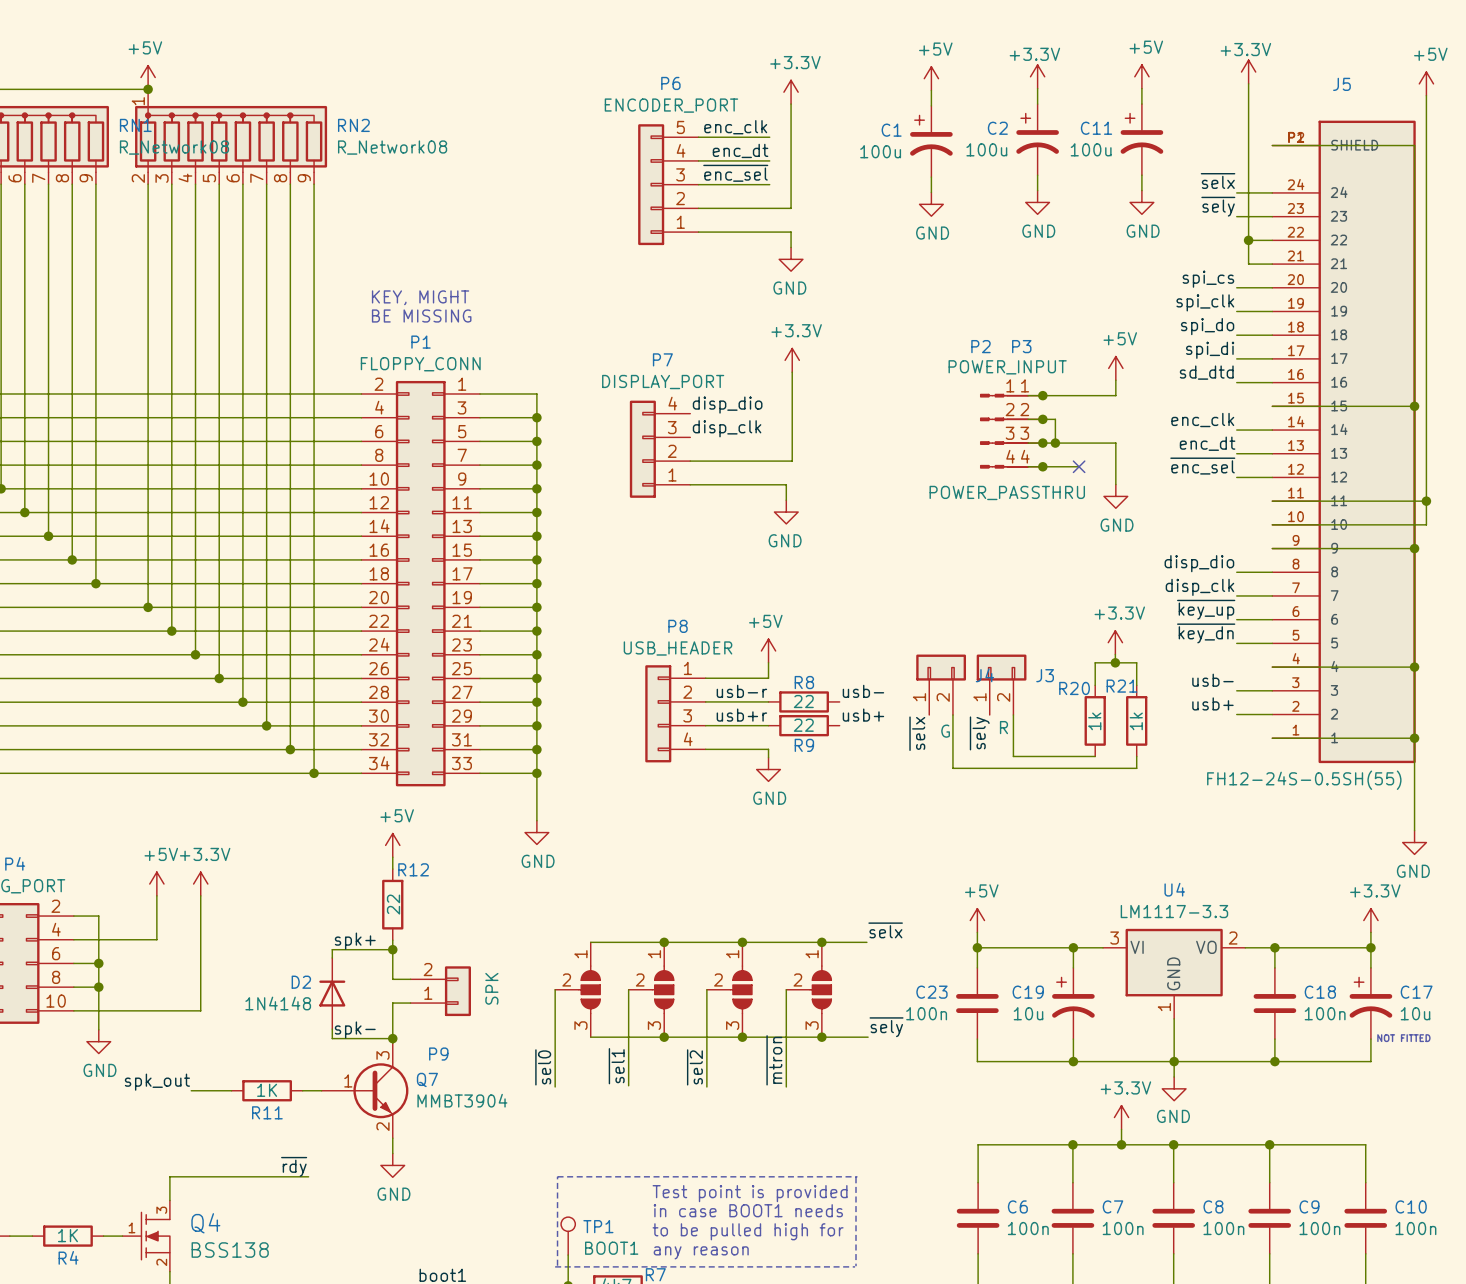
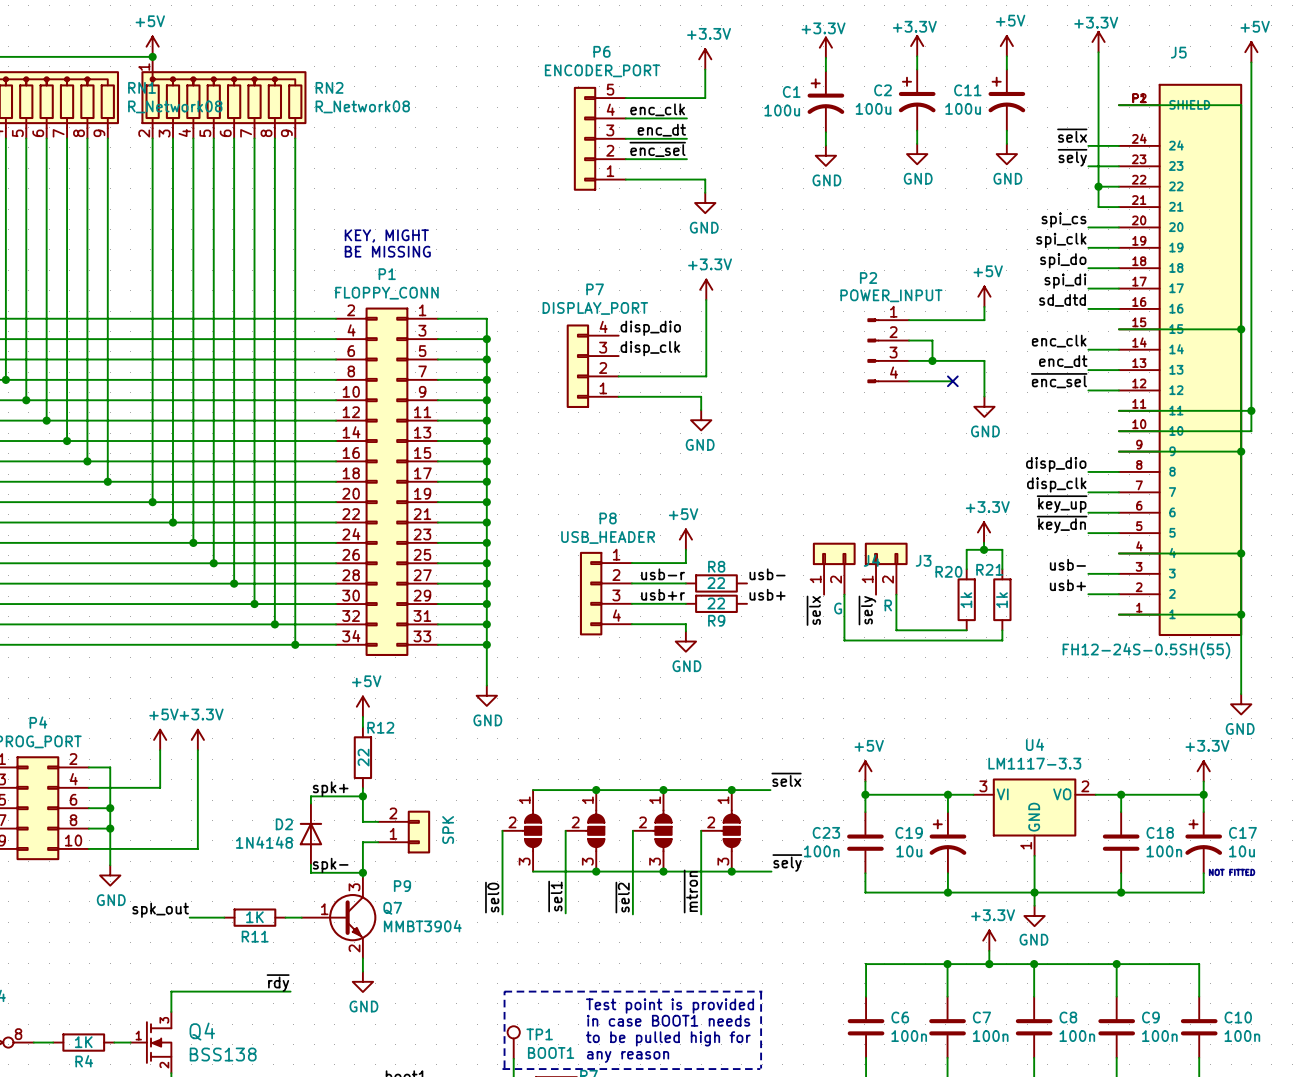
power symbol: +5V (931, 78) -> +3.3V (825, 47)
label: enc_clk (735, 127) -> none
wire: (791, 137) (791, 208) (769, 208) -> (705, 98) (686, 98)
label: enc_dt (740, 150) -> enc_clk (657, 109)
label: ~{enc_sel} (735, 173) -> enc_dt (661, 130)
label: none -> ~{enc_sel} (657, 149)
junction: (1042, 395) -> none
junction: (1042, 419) -> none
P3: POWER_PASSTHRU (1018, 431) -> none
junction: (1042, 443) -> none
junction: (1042, 466) -> none

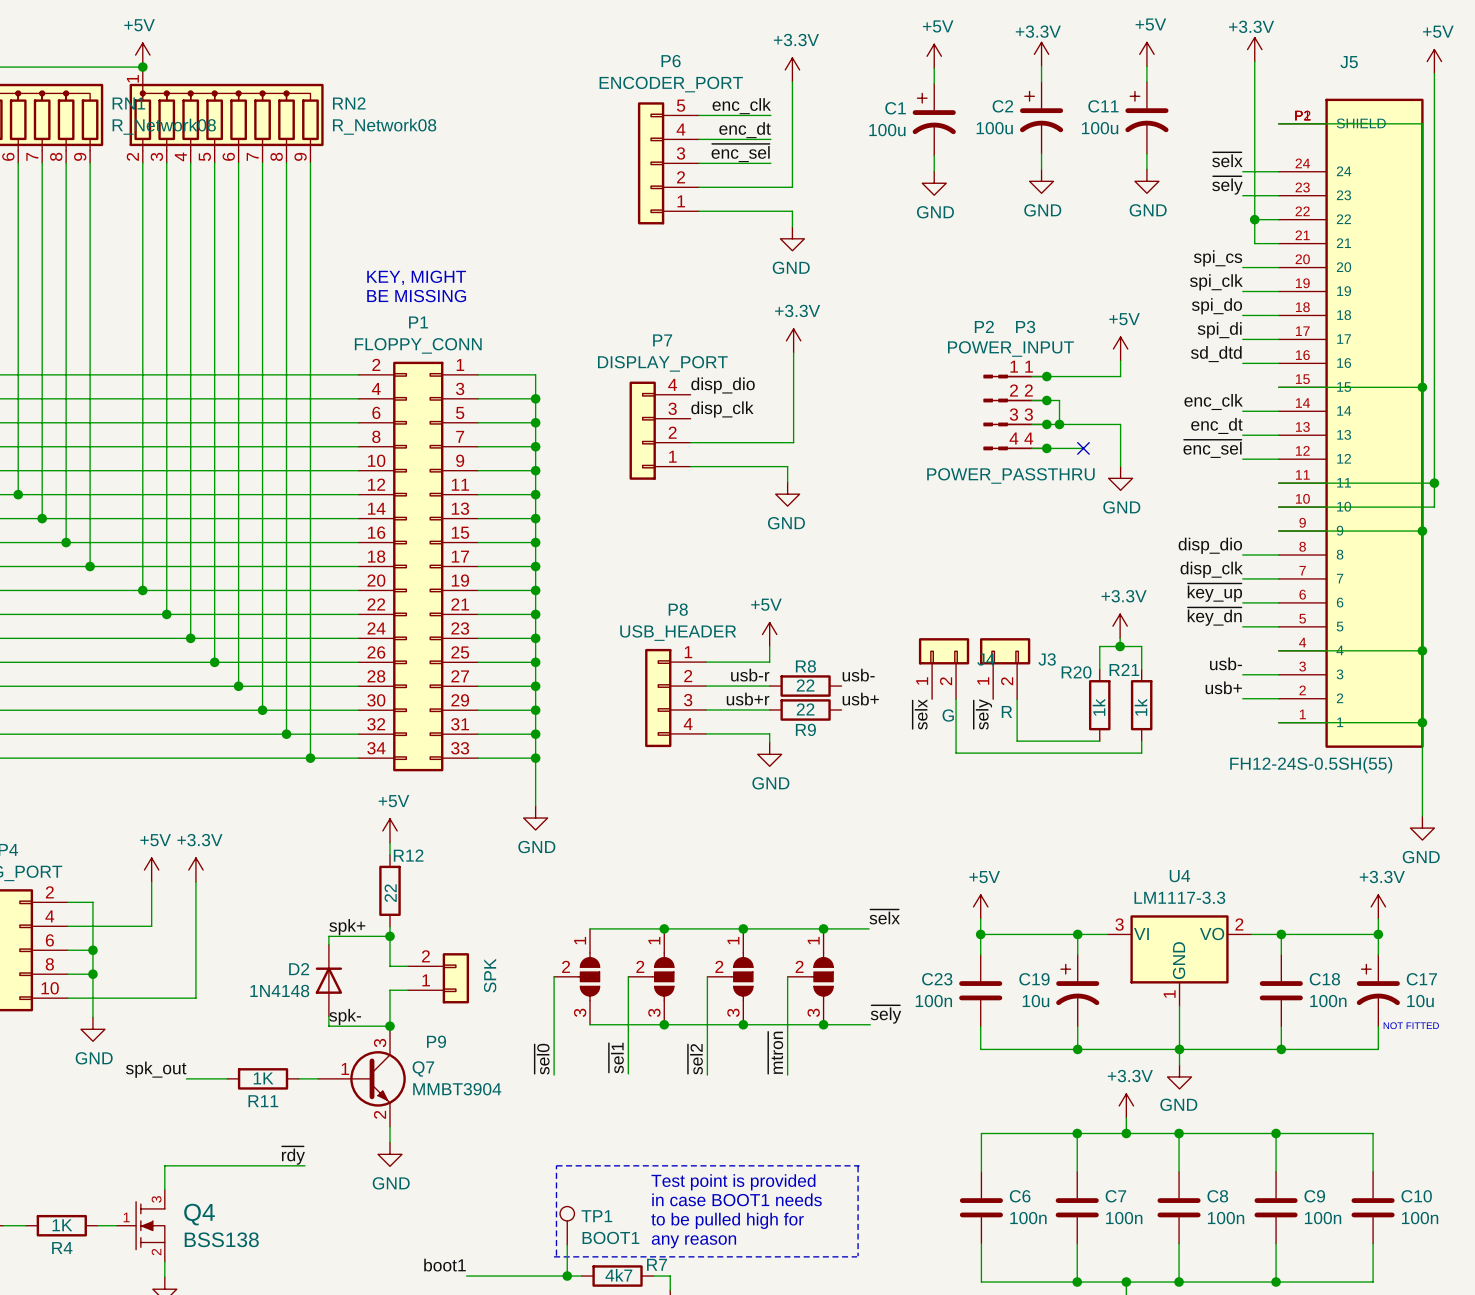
power symbol: +3.3V (825, 47) -> +5V (934, 56)
label: none -> enc_clk (741, 106)
wire: (686, 98) (705, 98) -> (770, 187) (792, 187) (792, 115)
label: enc_clk (657, 109) -> enc_dt (745, 130)
label: enc_dt (661, 130) -> ~{enc_sel} (740, 153)
label: ~{enc_sel} (657, 149) -> none
junction: none -> (1046, 376)
junction: none -> (1046, 400)
P3: none -> POWER_PASSTHRU (1022, 412)
junction: none -> (1046, 424)
junction: none -> (1046, 448)

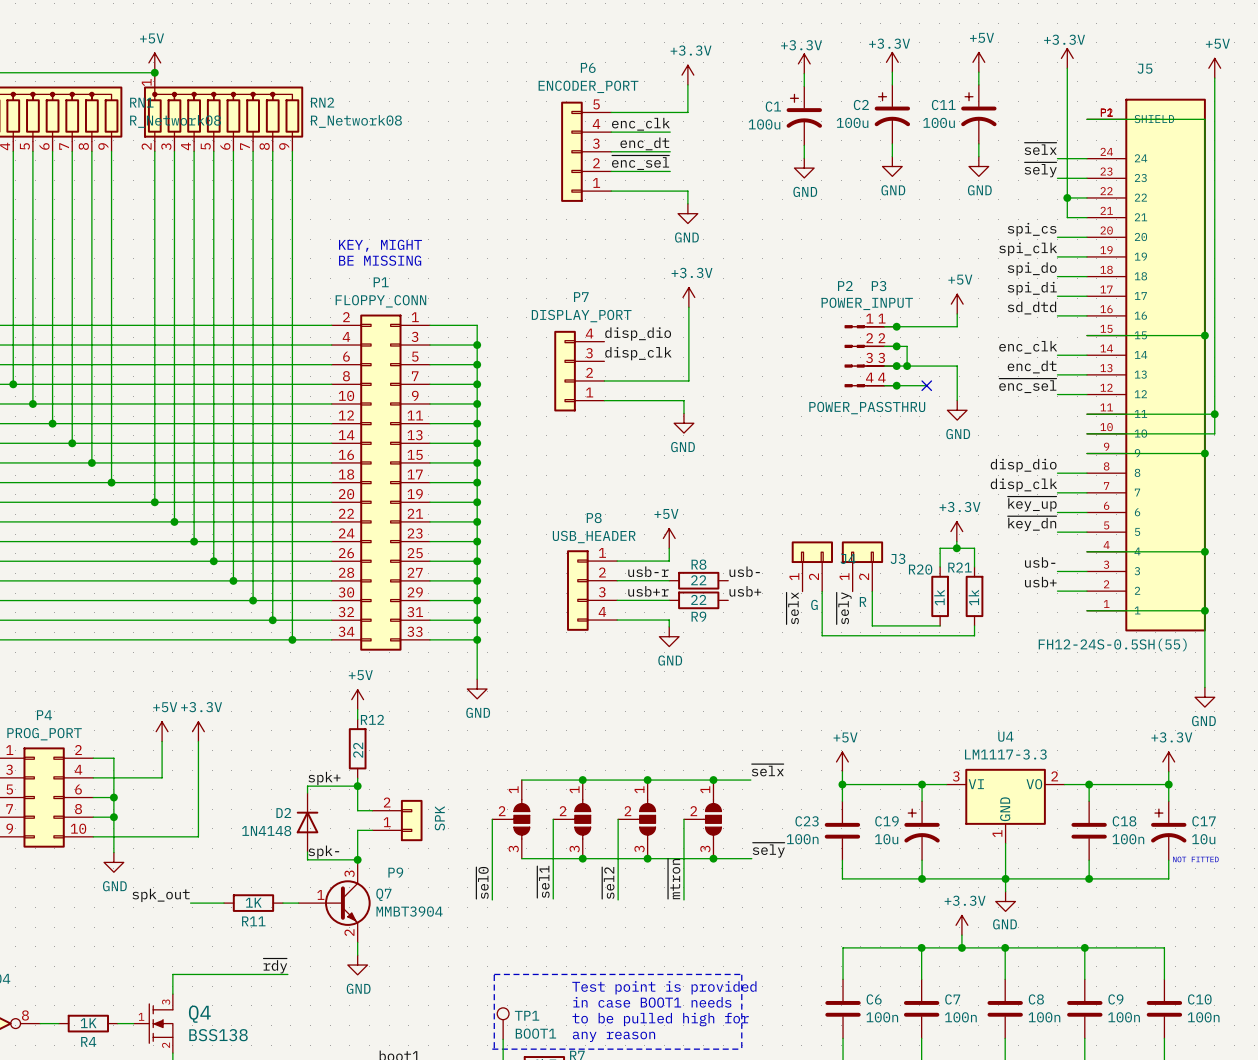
power symbol: +5V (934, 56) -> +3.3V (804, 63)
label: enc_clk (741, 106) -> none
wire: (792, 115) (792, 187) (770, 187) -> (687, 112) (670, 112)
label: enc_dt (745, 130) -> enc_clk (640, 124)
label: ~{enc_sel} (740, 153) -> enc_dt (644, 143)
label: none -> ~{enc_sel} (640, 162)

